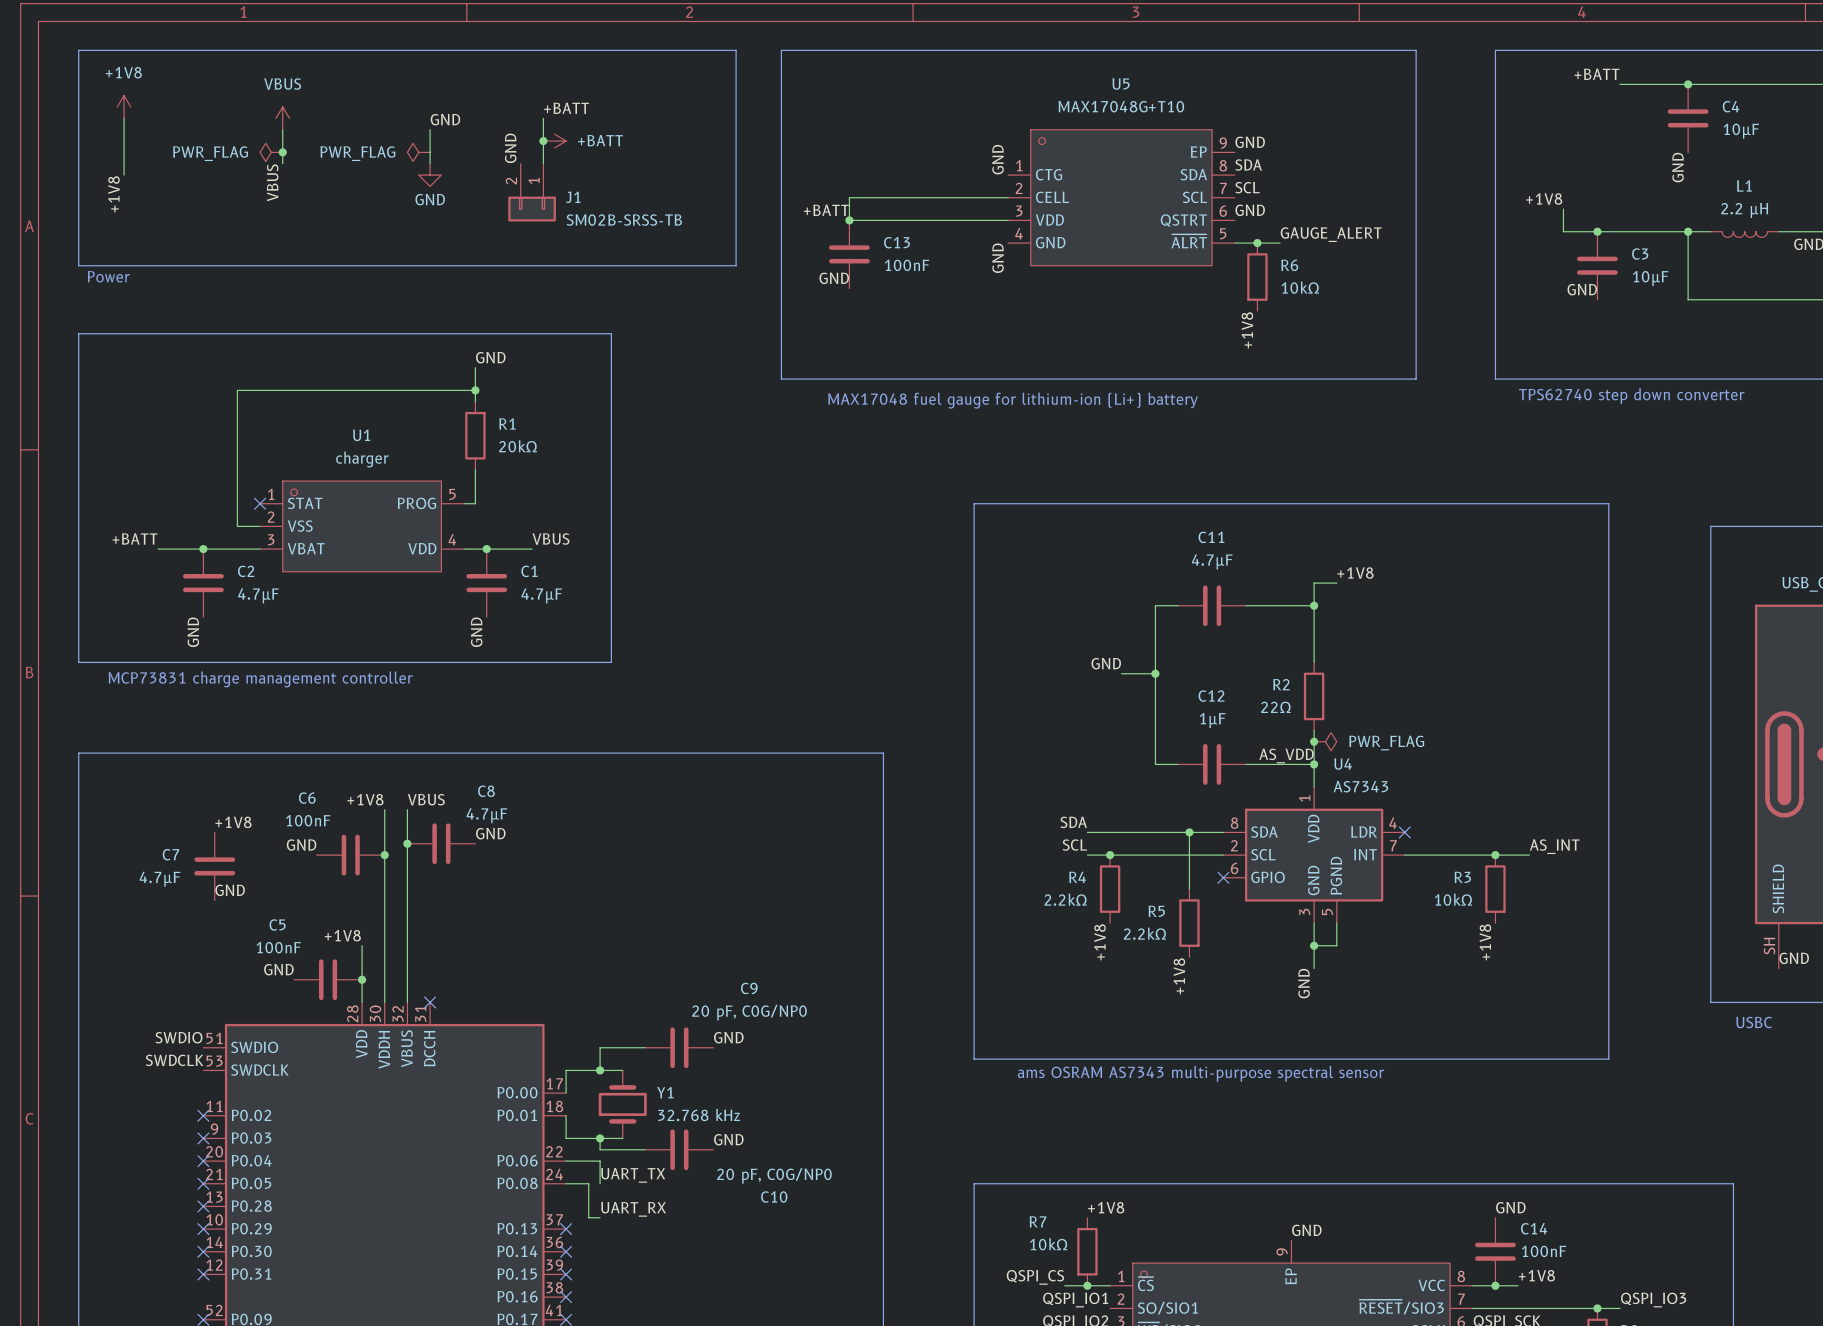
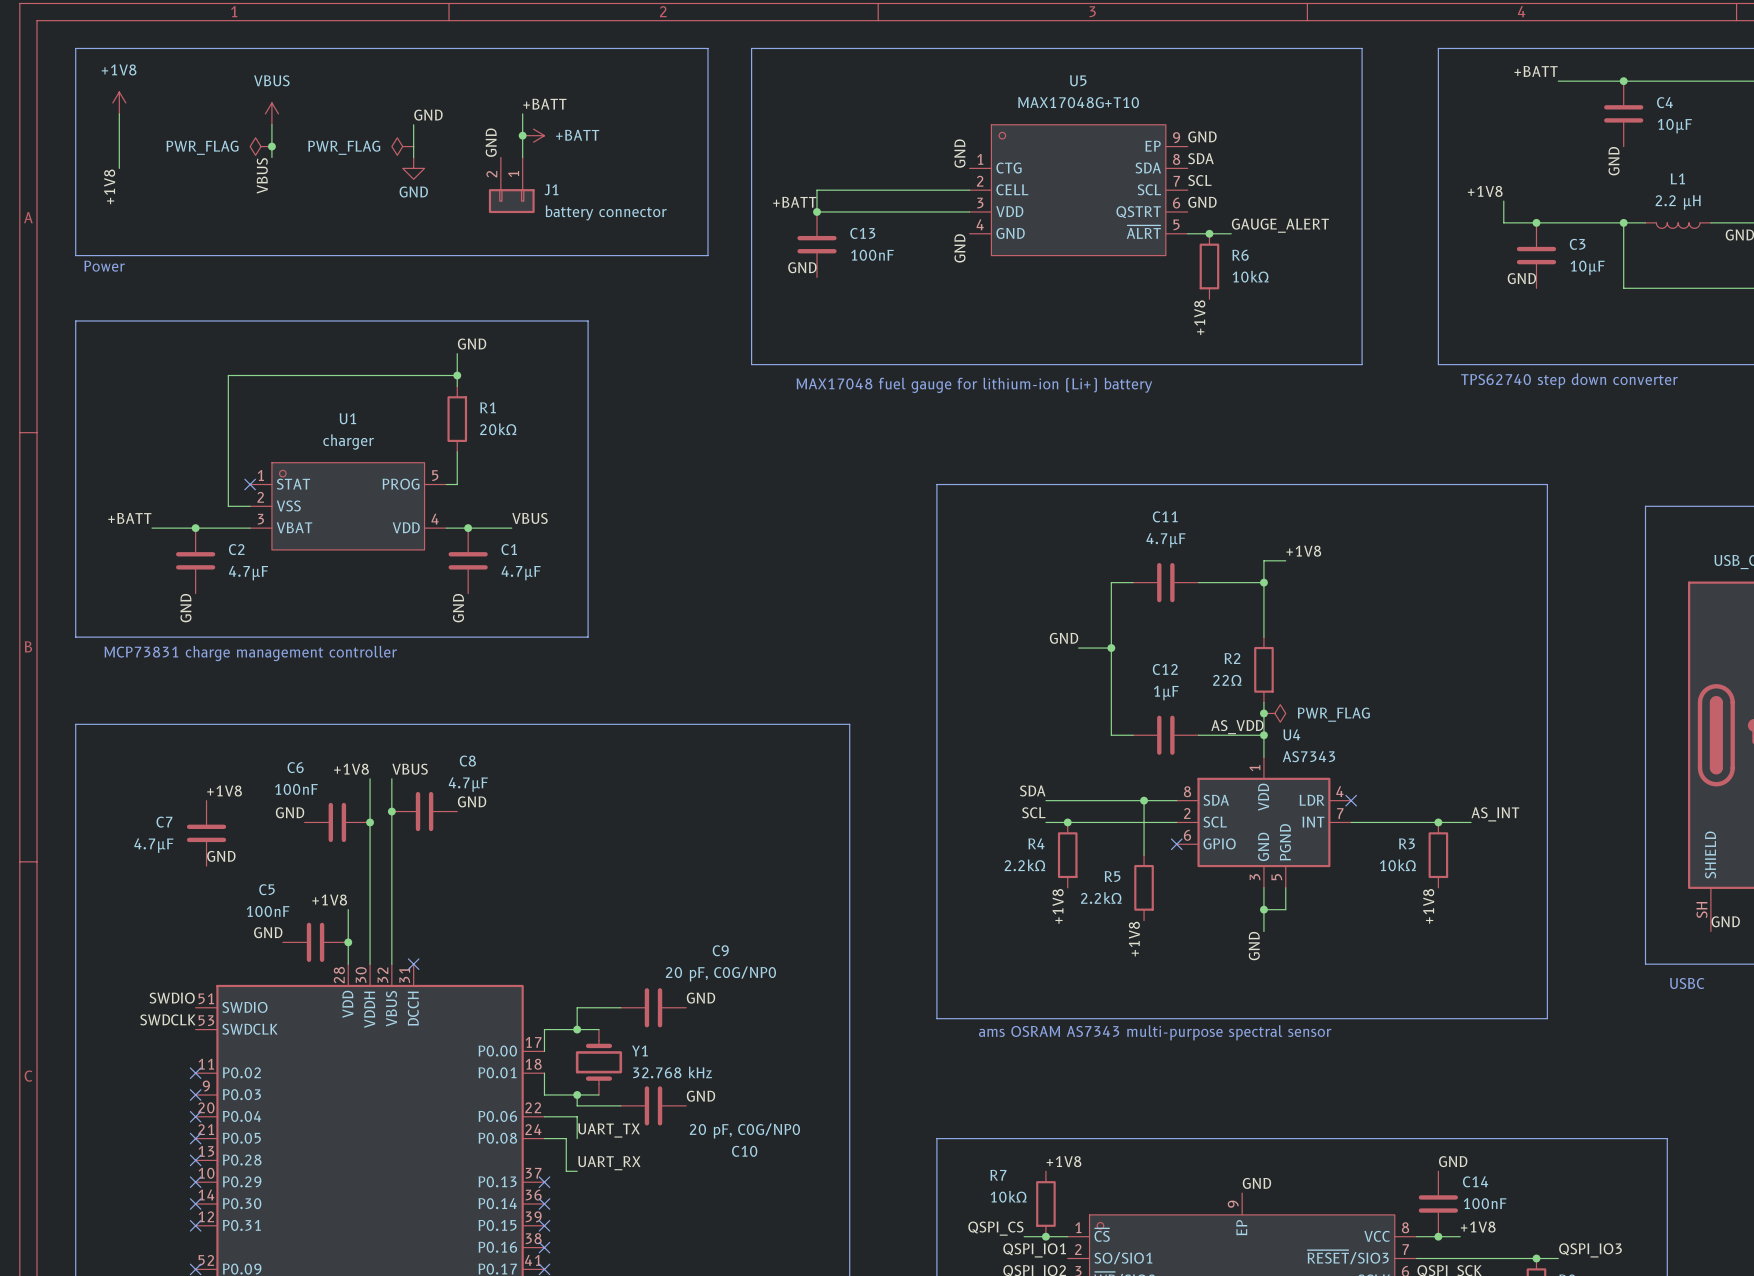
J1 value: SM02B-SRSS-TB (624, 220) -> battery connector (606, 212)

